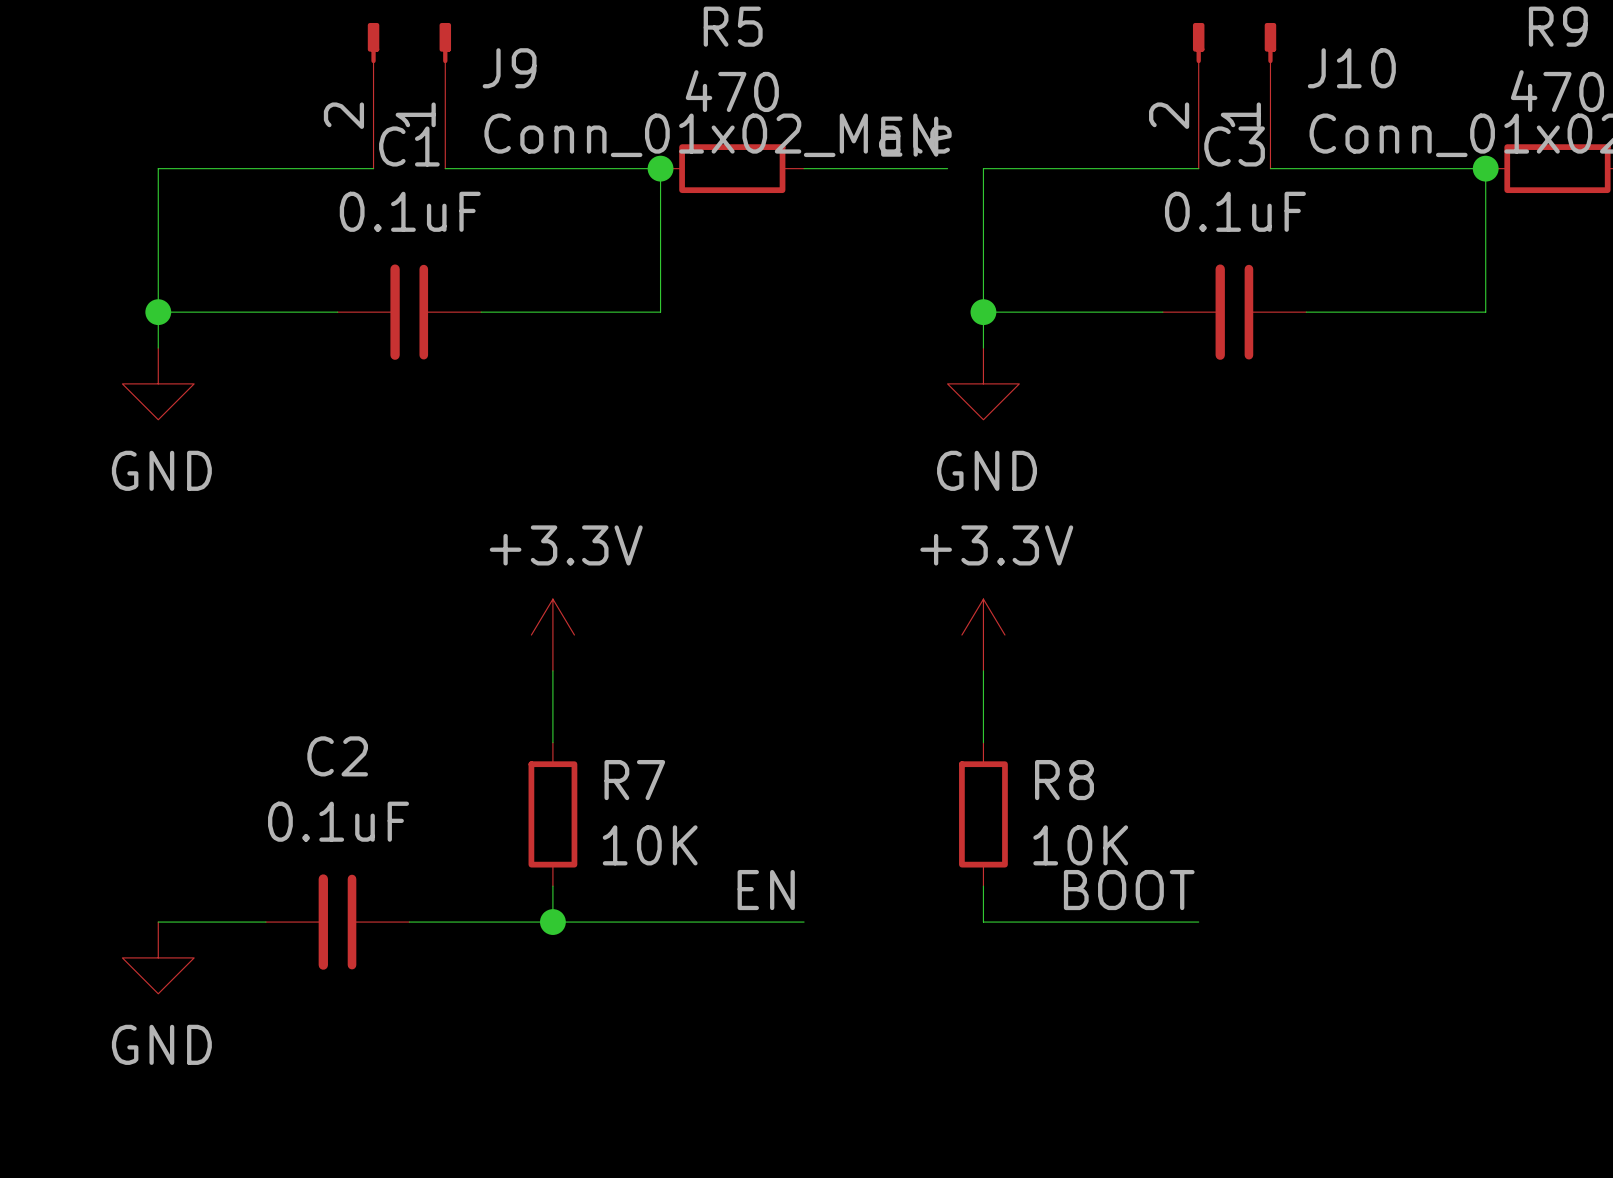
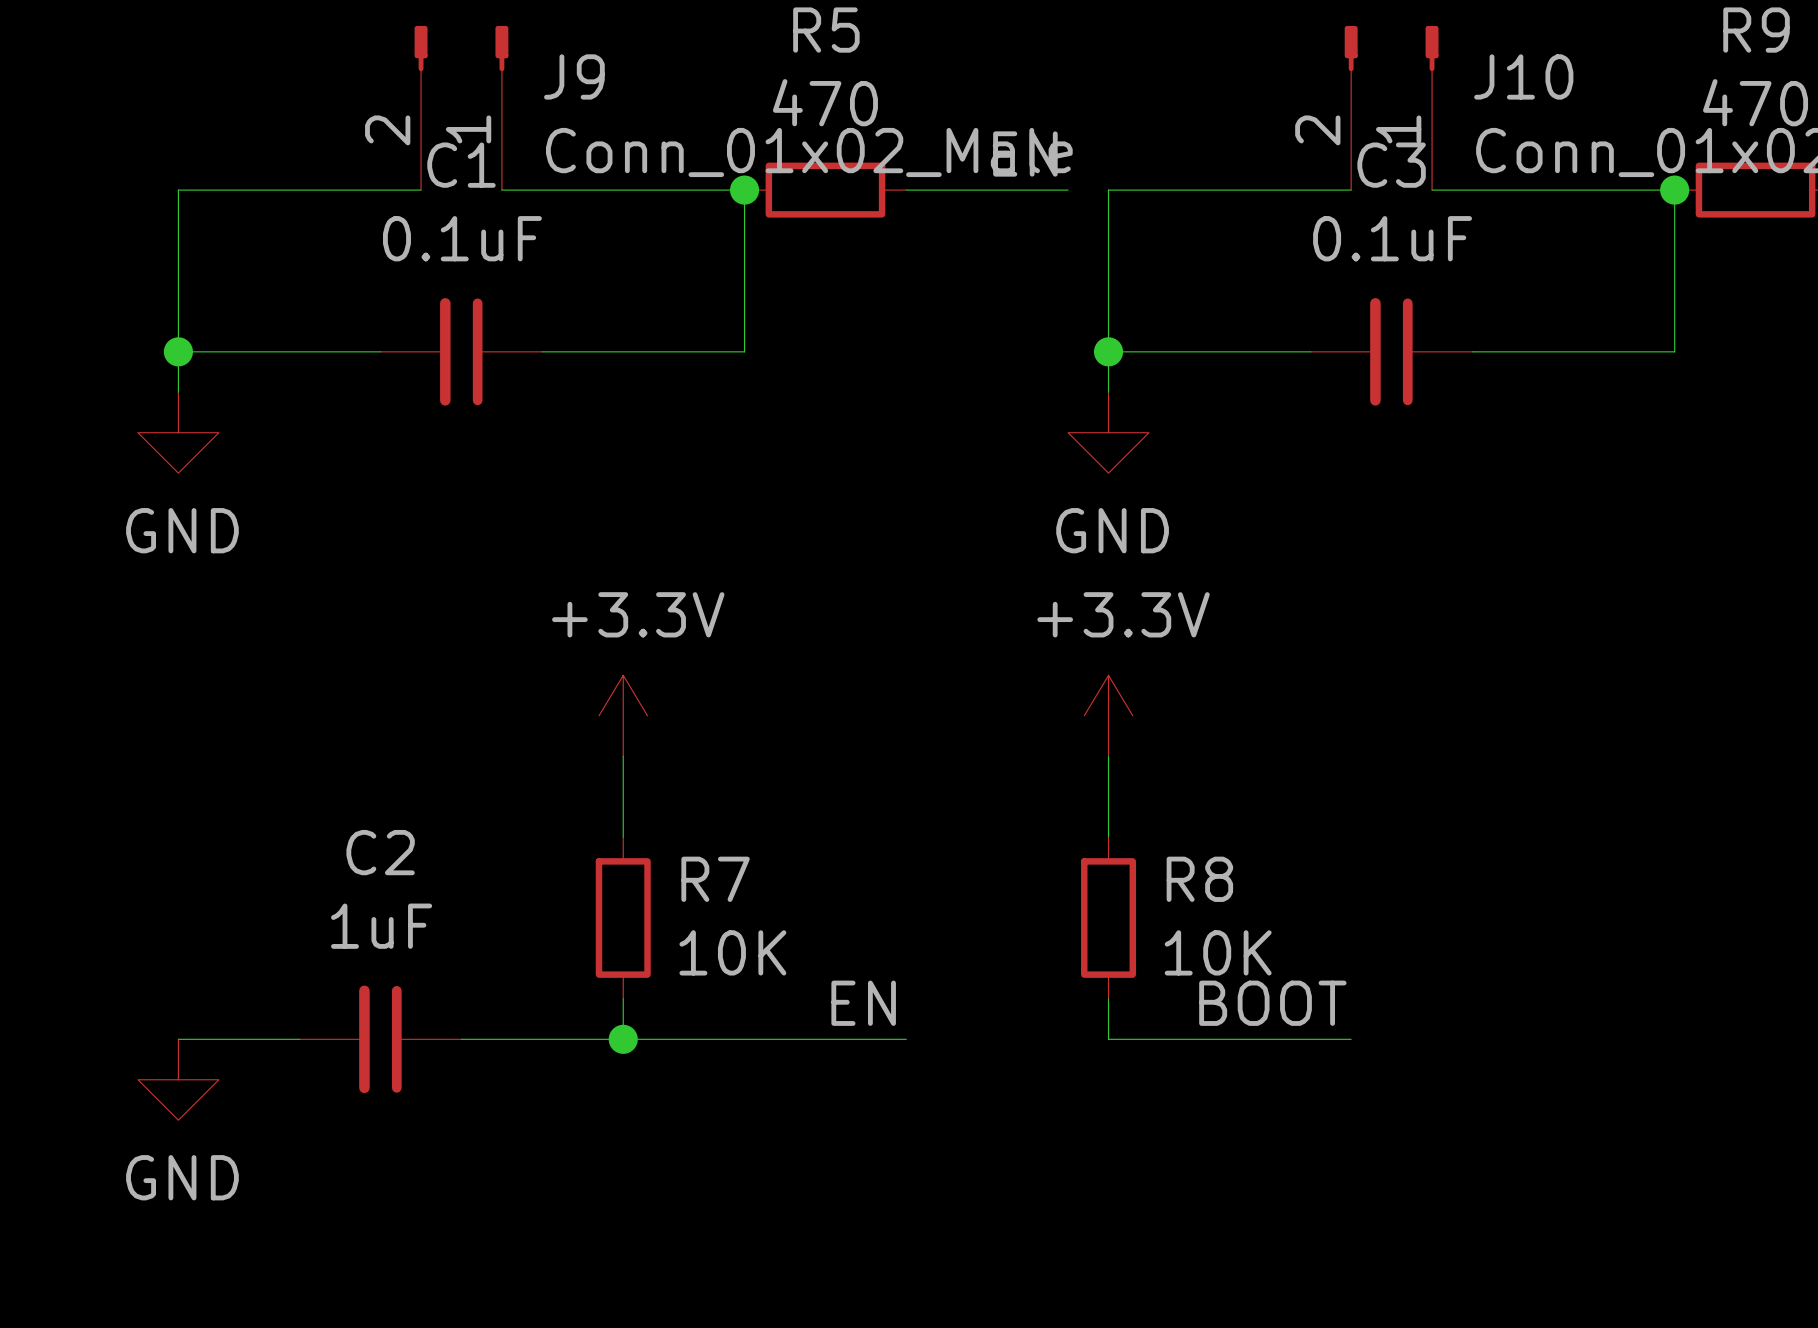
C2 value: 0.1uF (338, 821) -> 1uF (381, 926)

